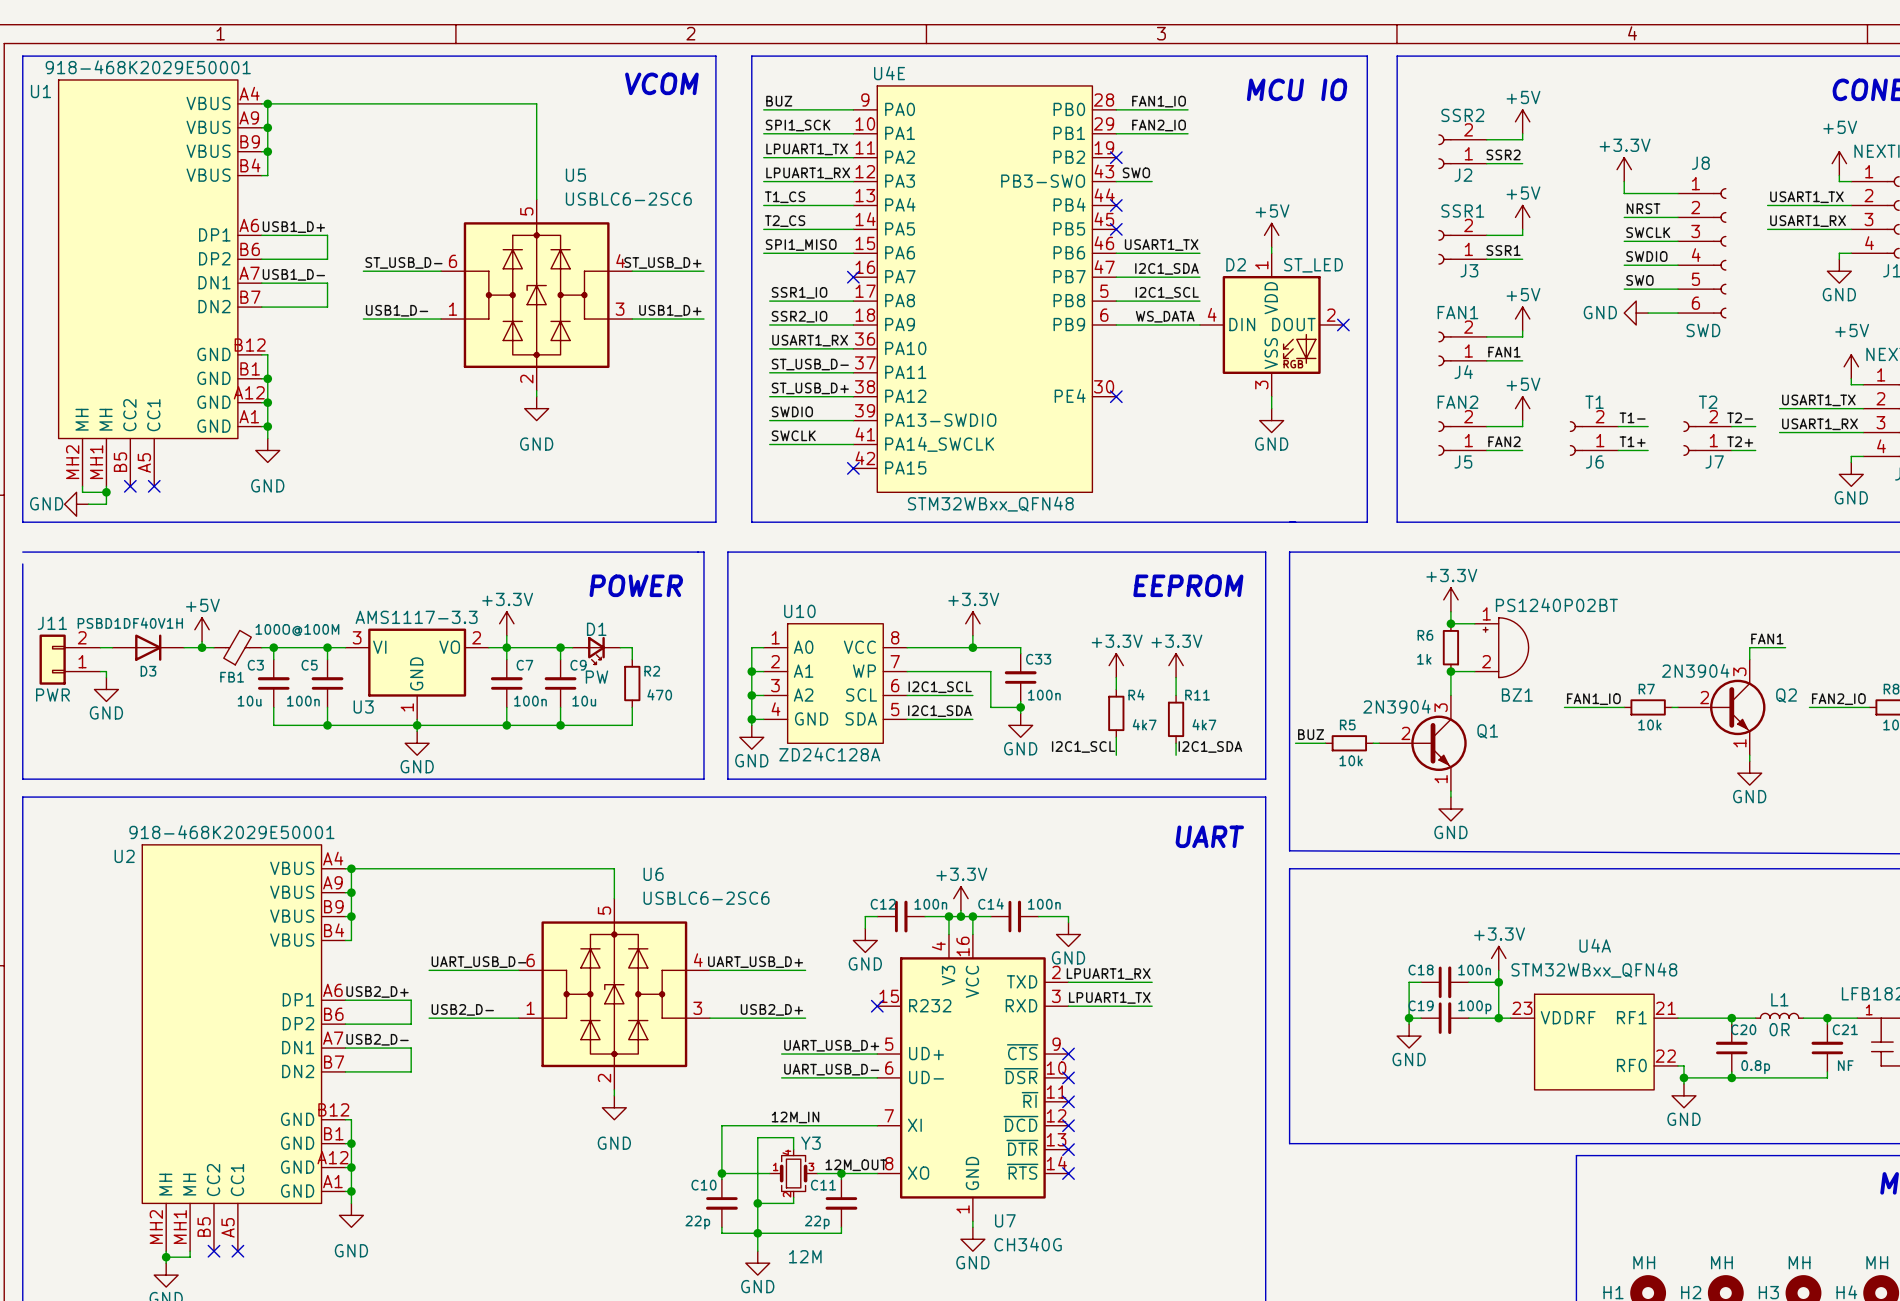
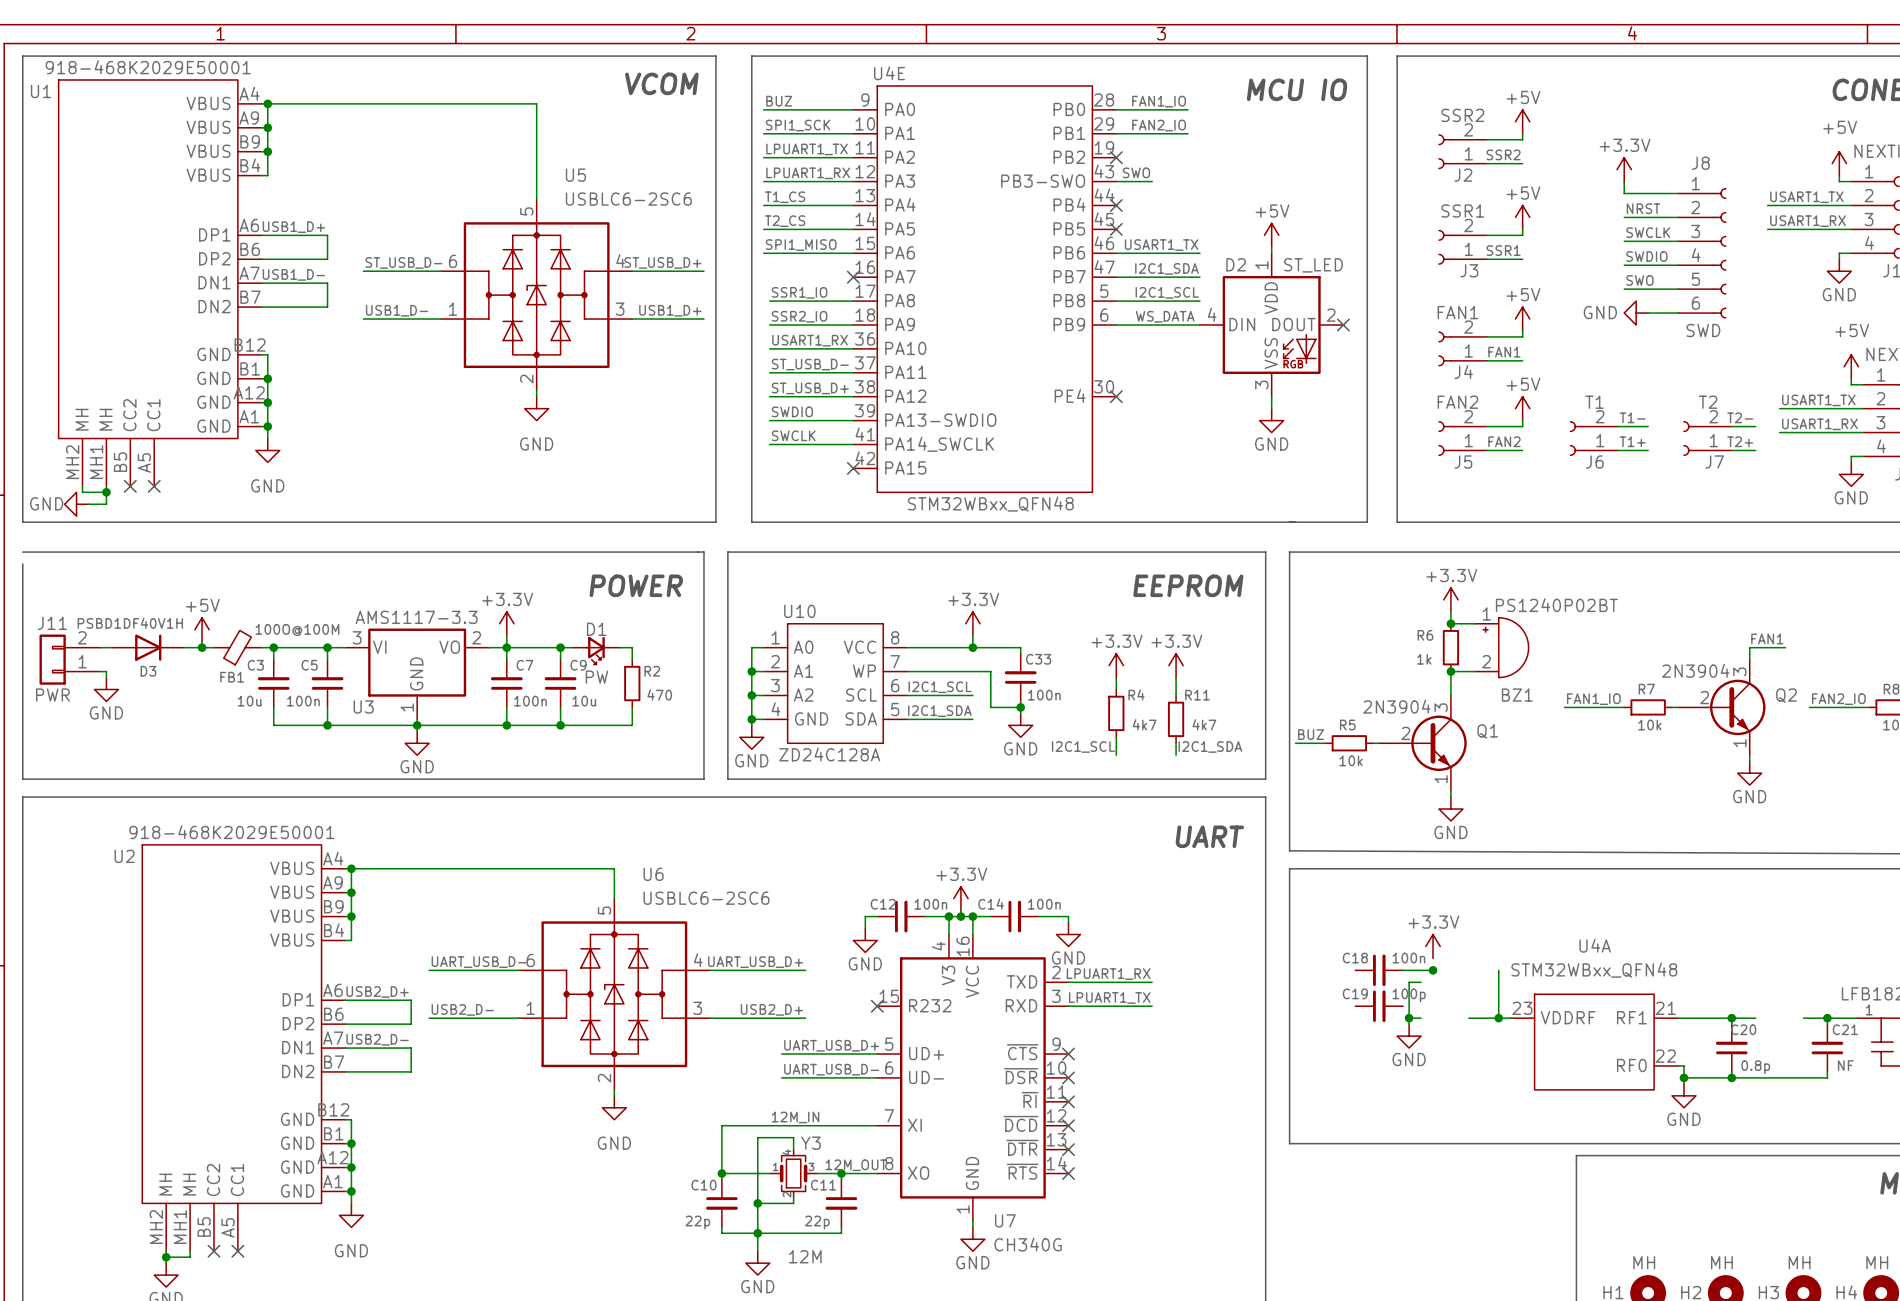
power symbol position: +3.3V (1498, 958) -> +3.3V (1433, 946)
junction: none -> (1433, 970)
C18 position: (1444, 982) -> (1379, 970)
wire: (1468, 982) (1498, 982) -> (1403, 970) (1433, 970)
junction: (1498, 982) -> none
L1: 0R (1779, 1015) -> none
C19 position: (1444, 1018) -> (1379, 1006)

